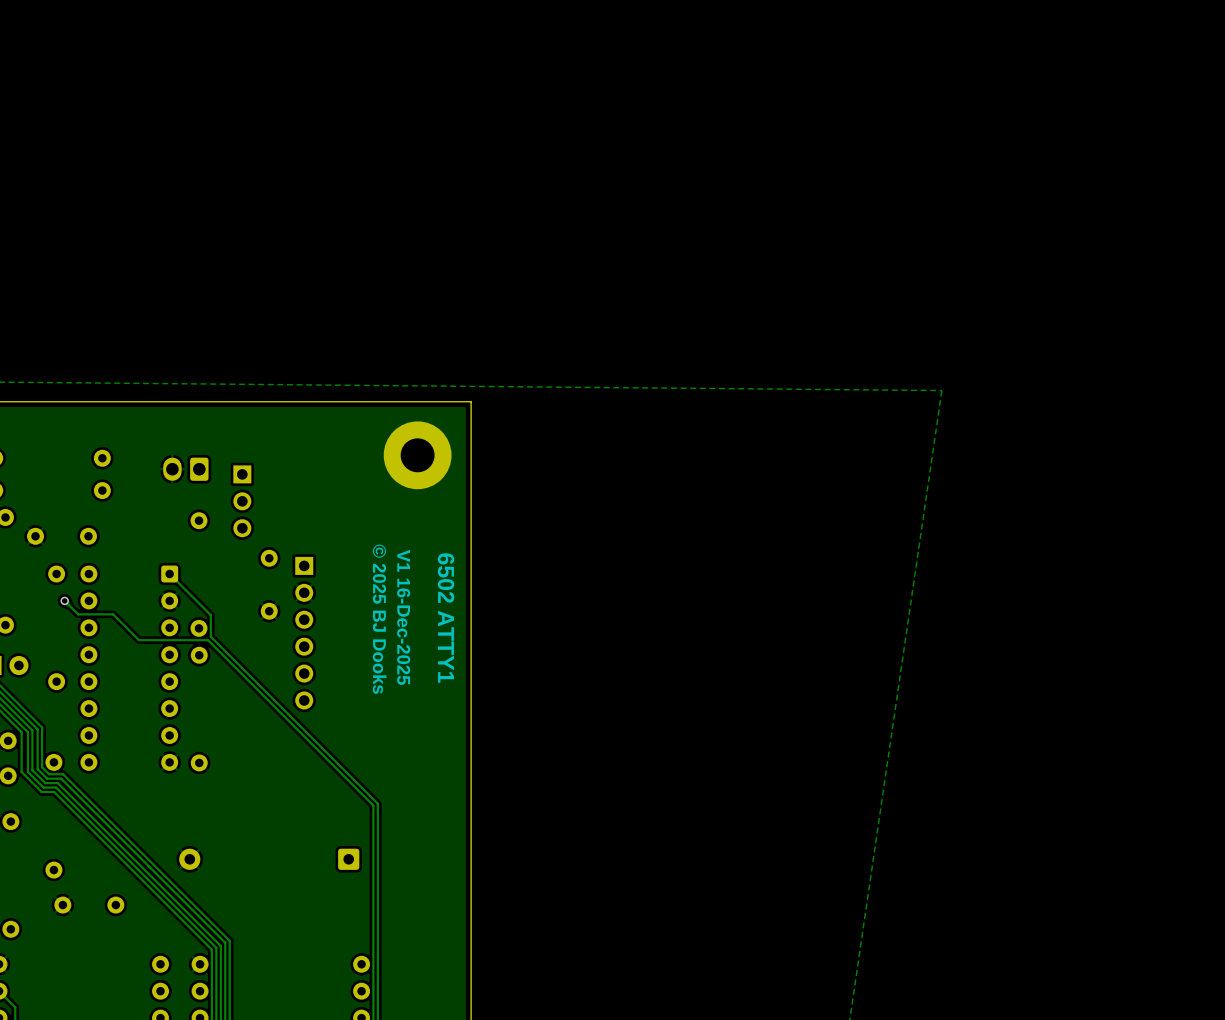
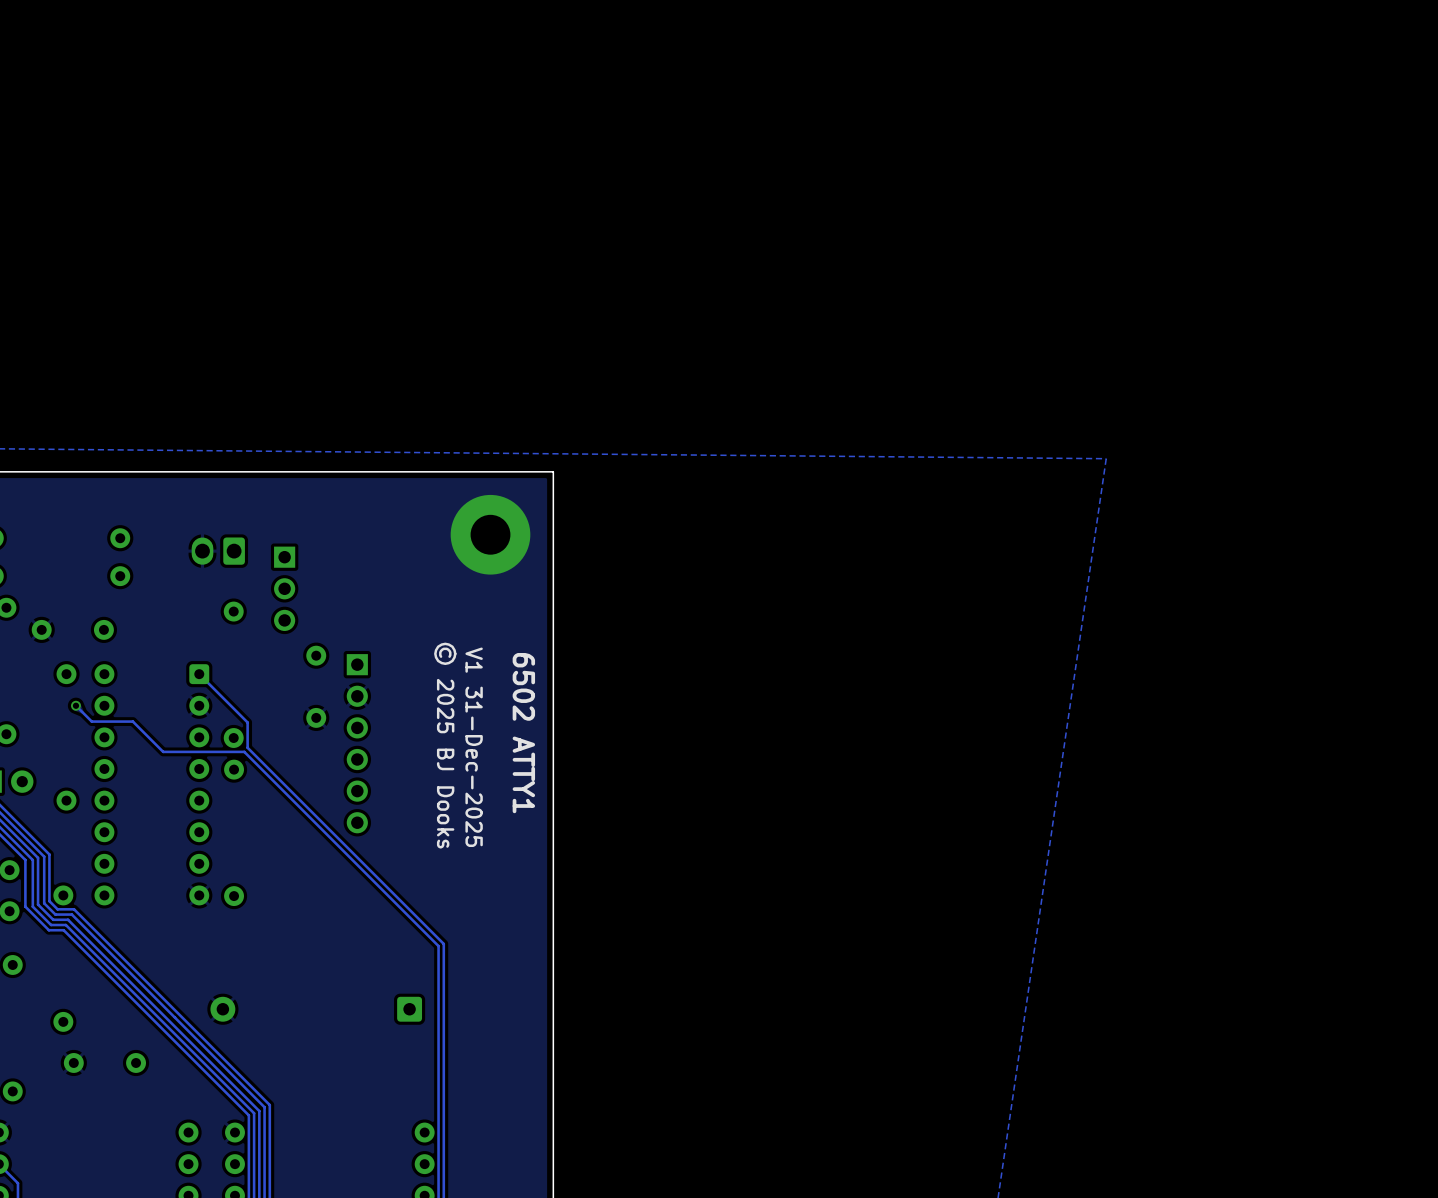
text: V1 16-Dec-2025 (403, 617) -> V1 31-Dec-2025 (474, 747)

